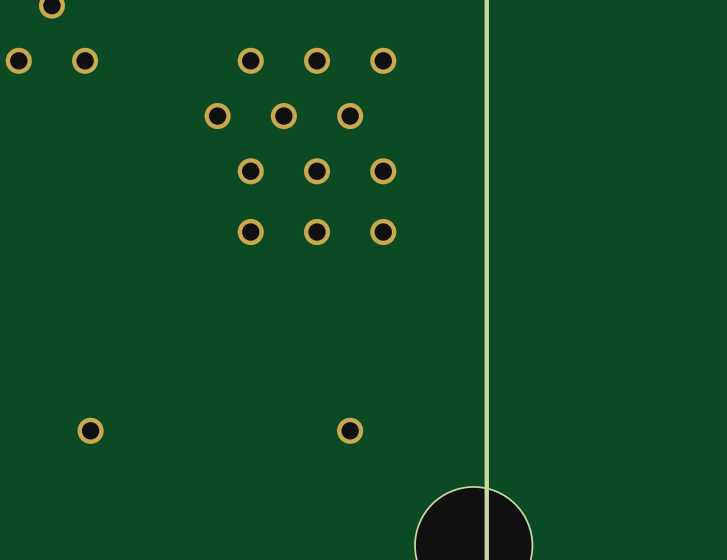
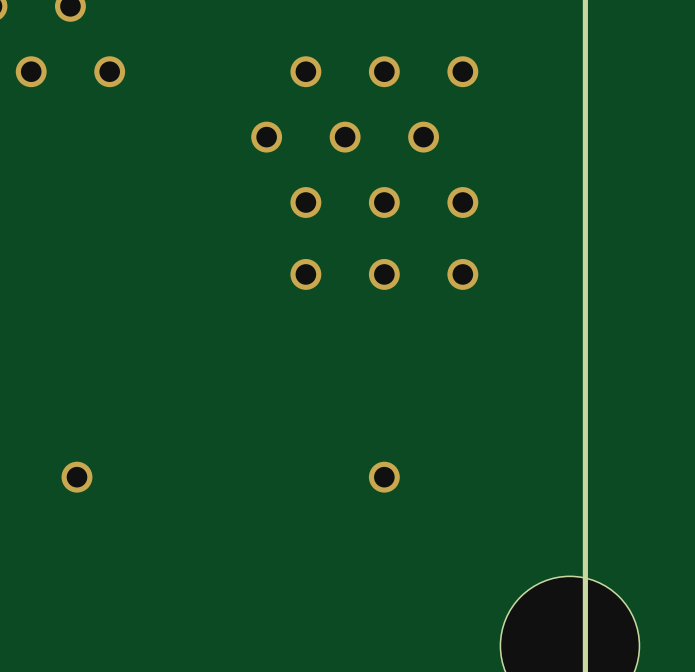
via position: (90, 430) -> (76, 477)
via position: (350, 430) -> (384, 477)

